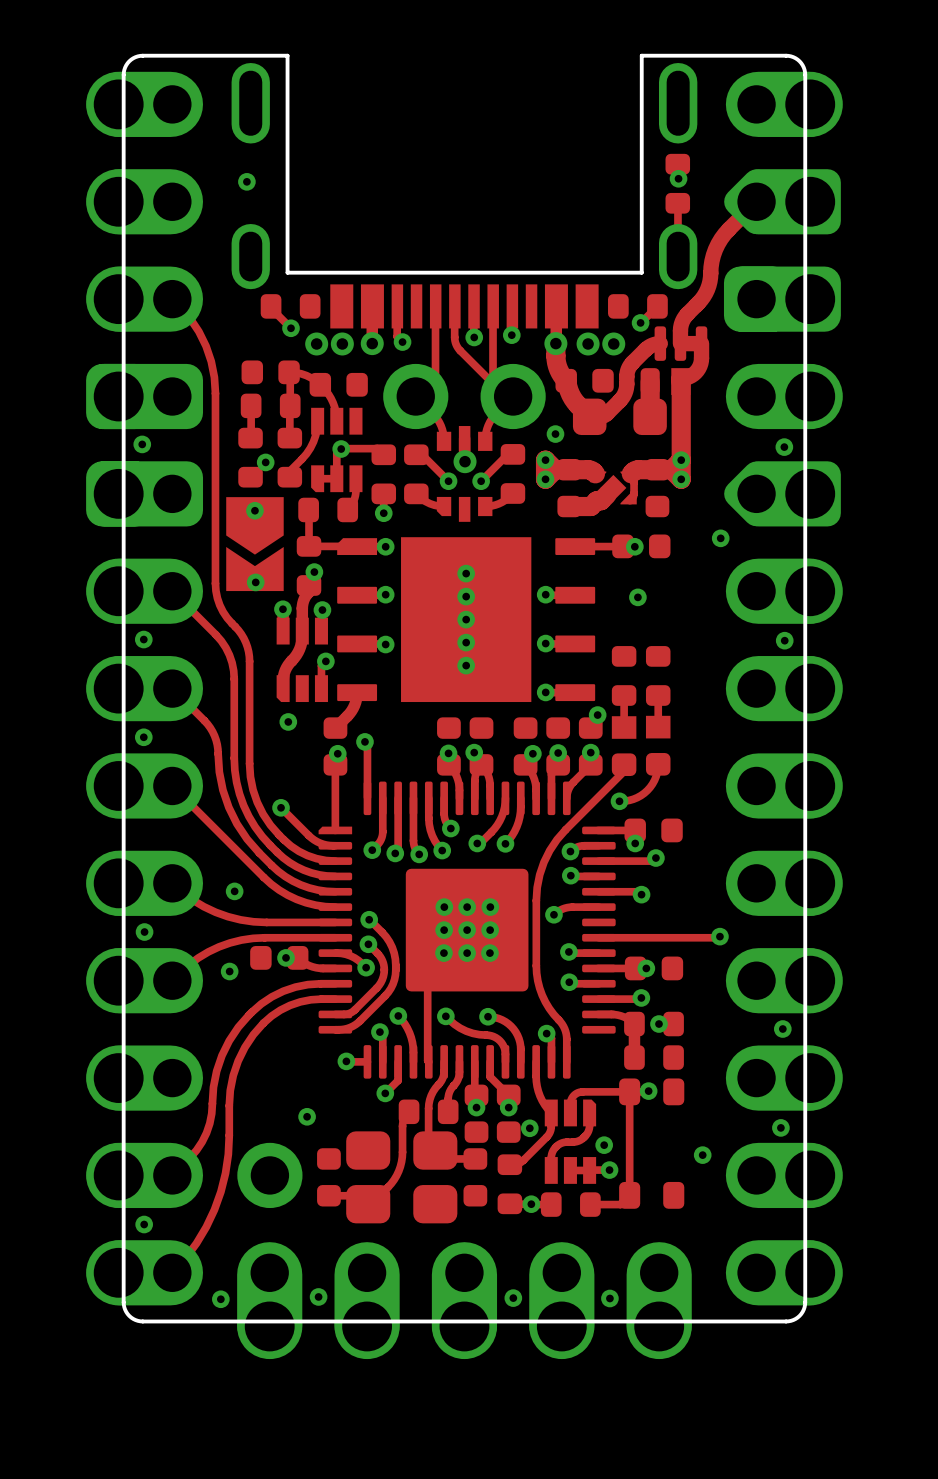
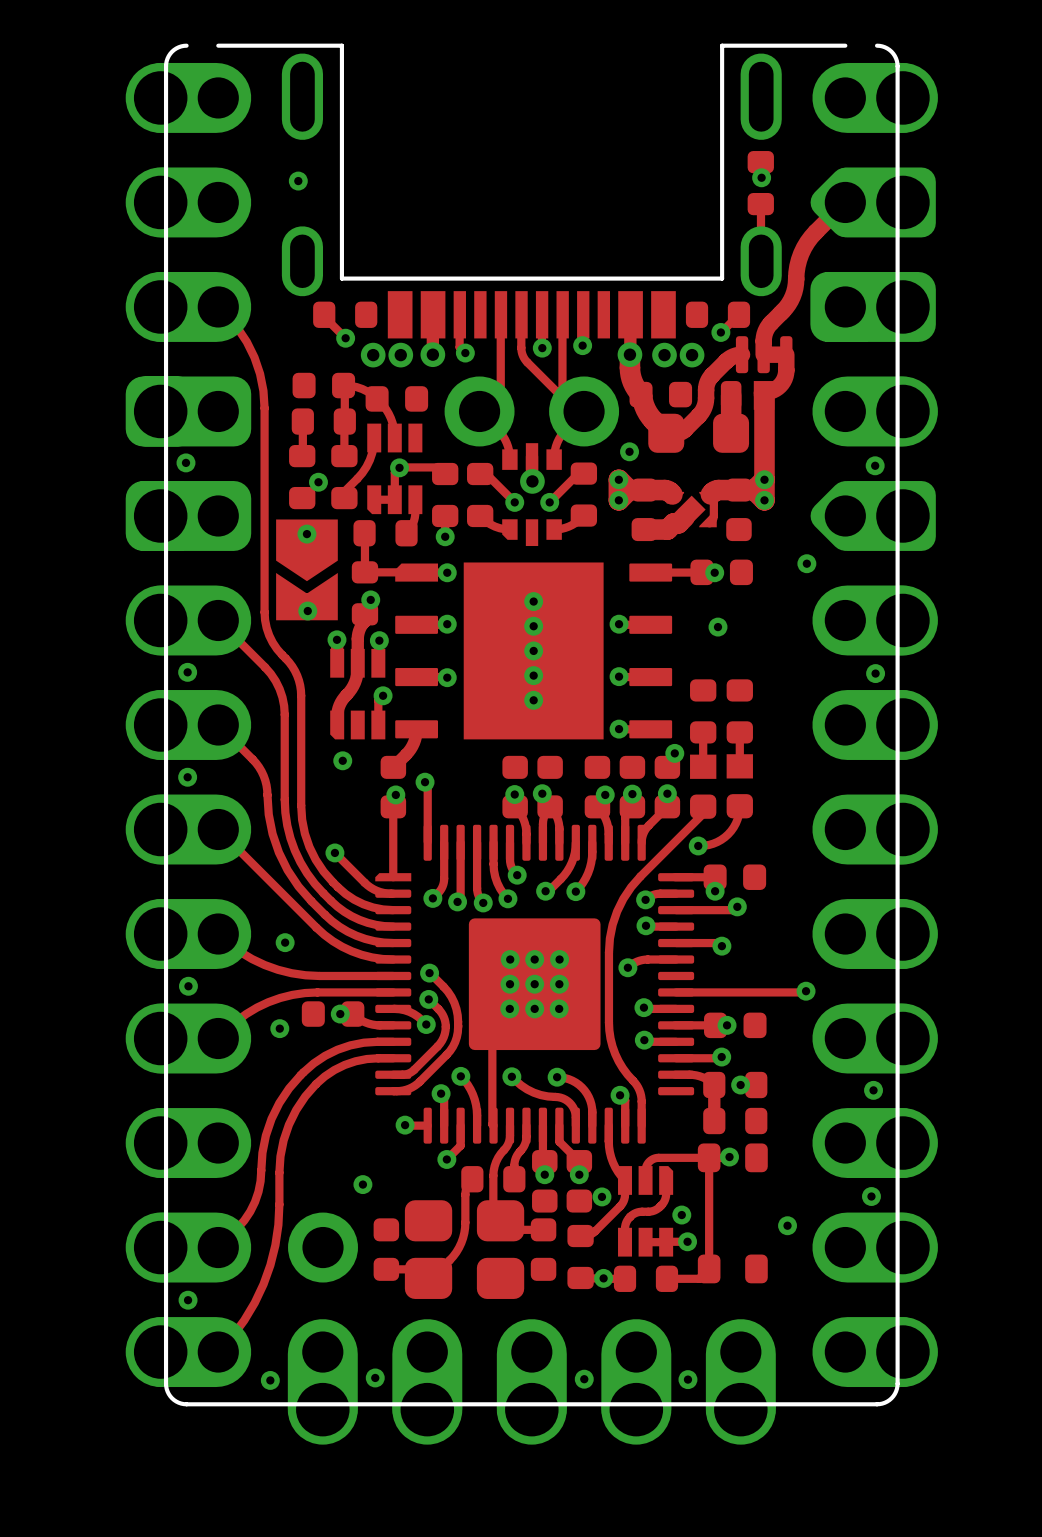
board edge: (142, 55) (172, 55) -> none
board edge: (756, 55) (786, 55) -> none

